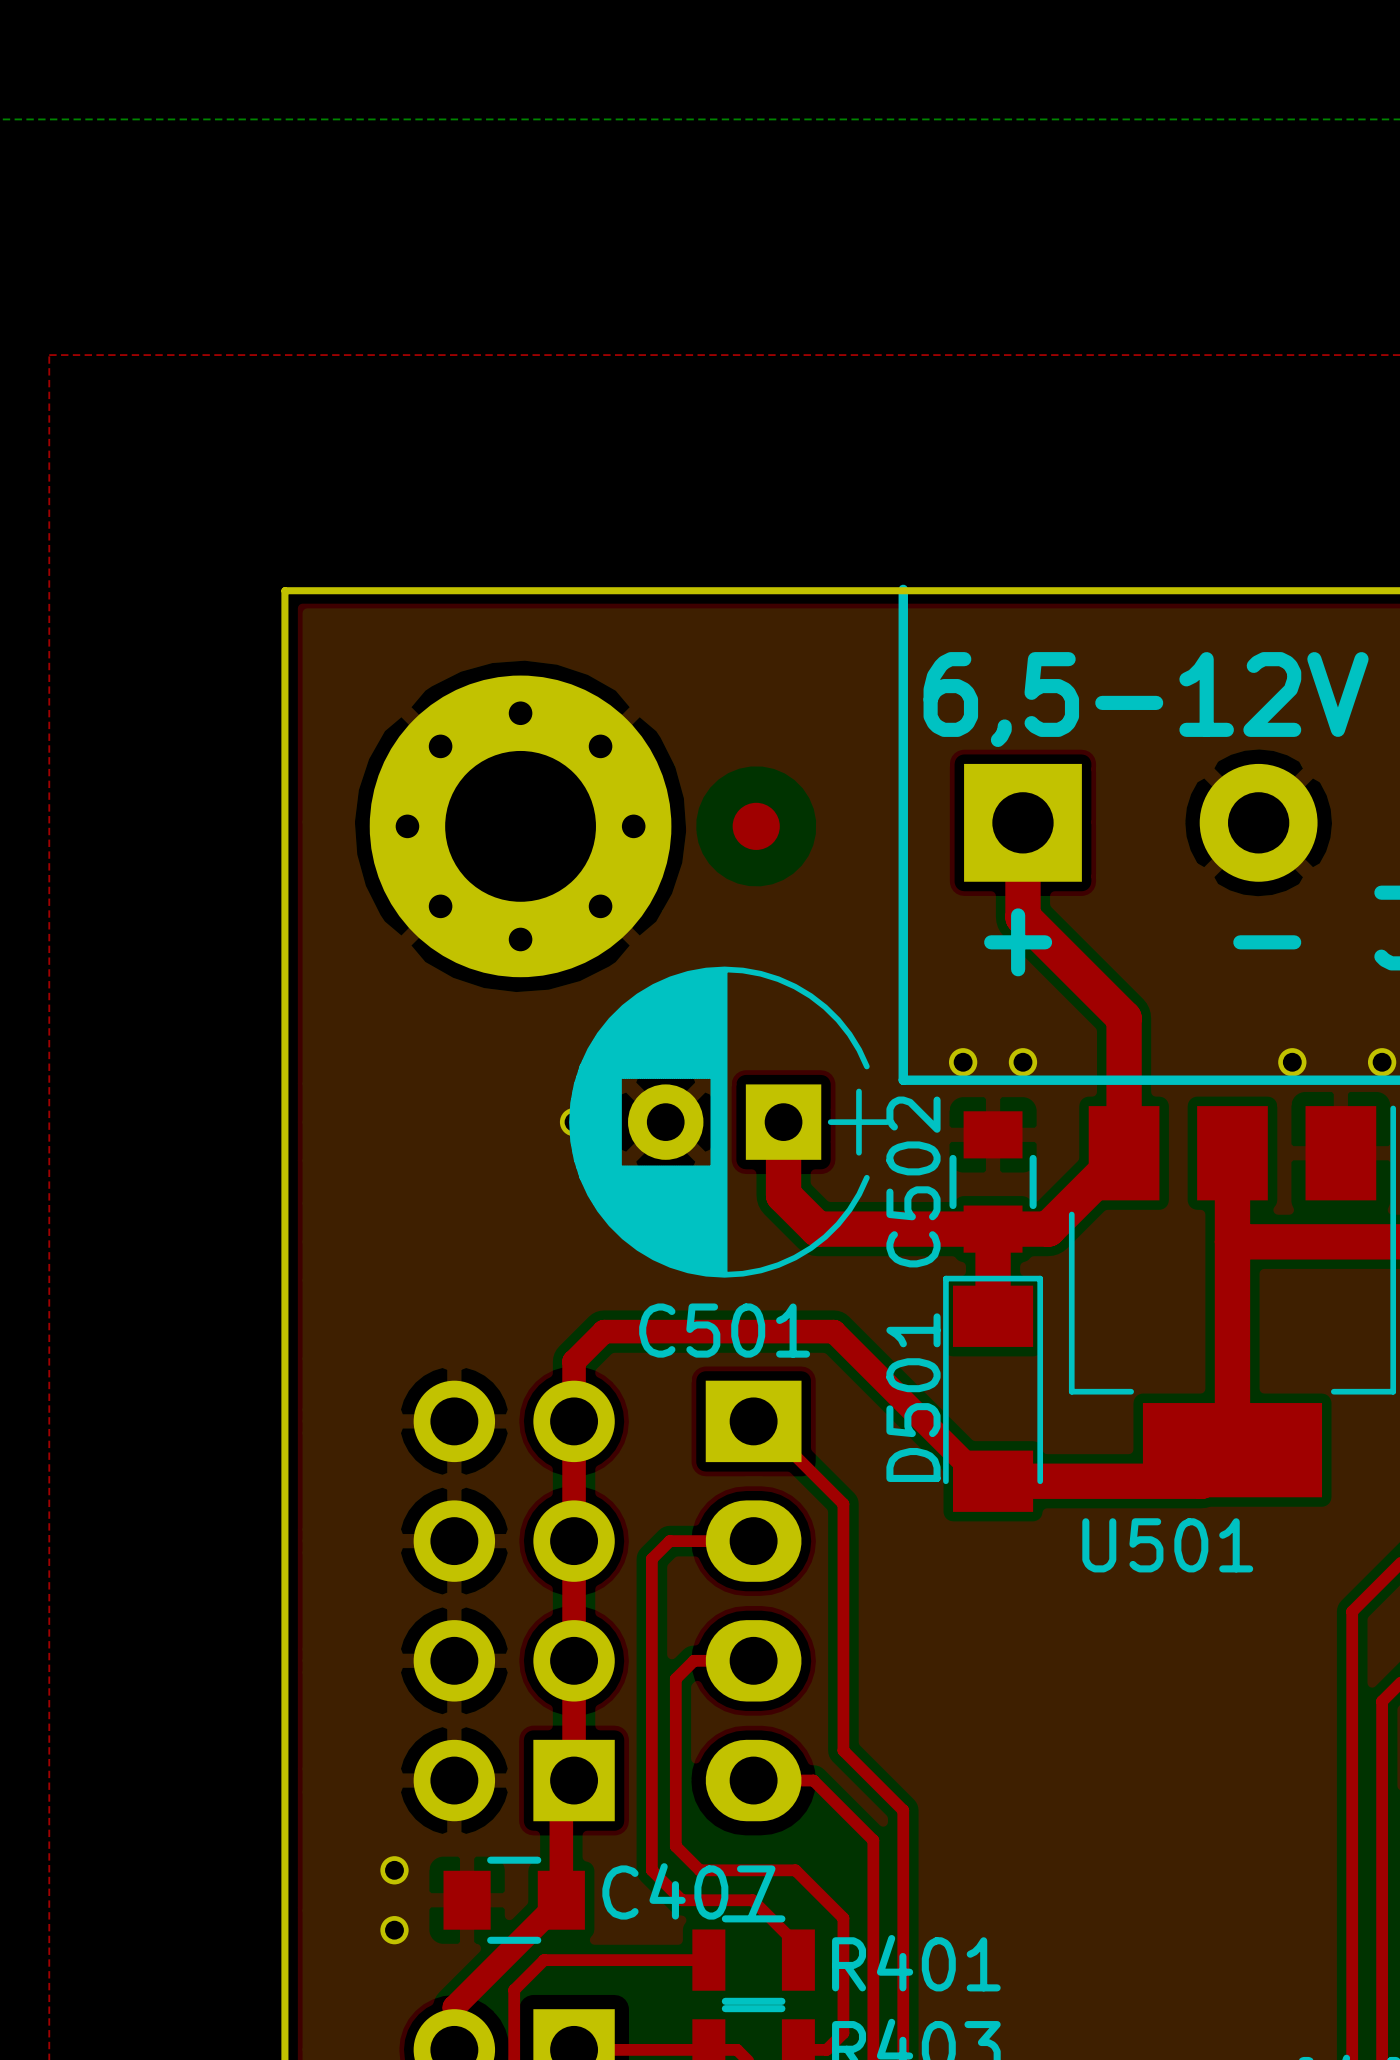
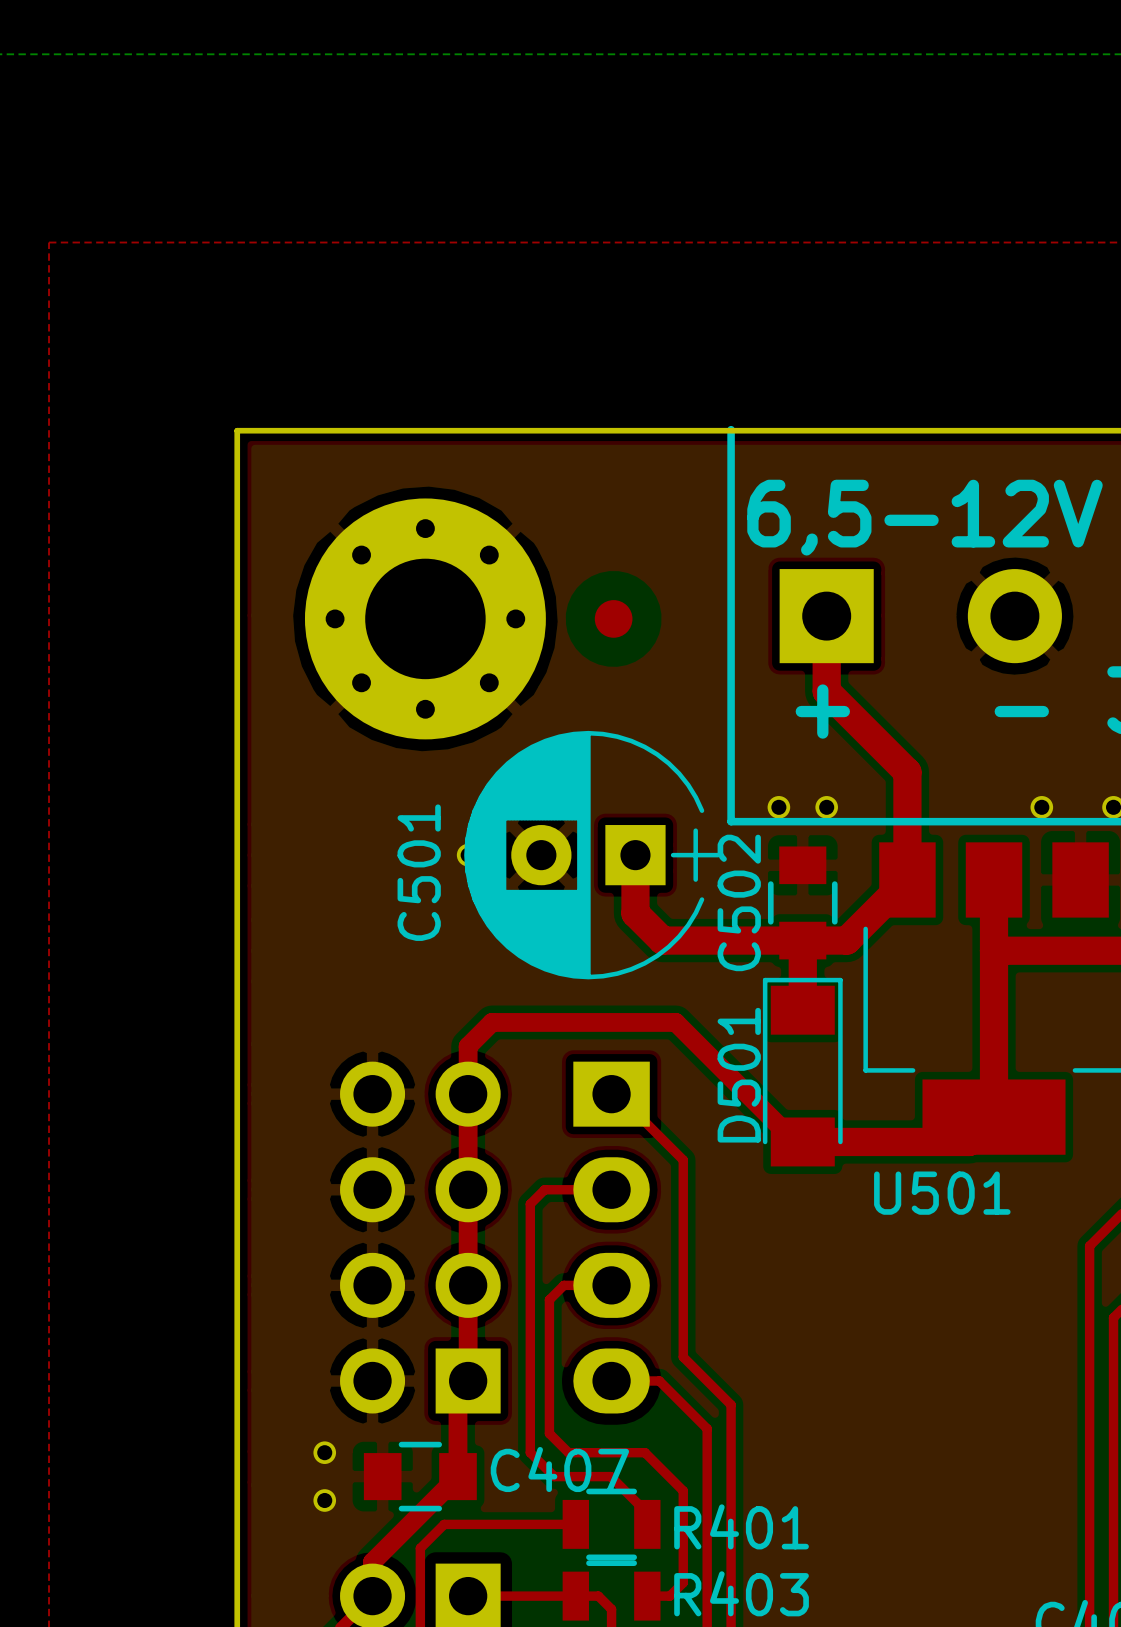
C501 name rotation: 0° (724, 1330) -> 90° counterclockwise (419, 872)
C501 name position: C501 (724, 1330) -> C501 (419, 872)

